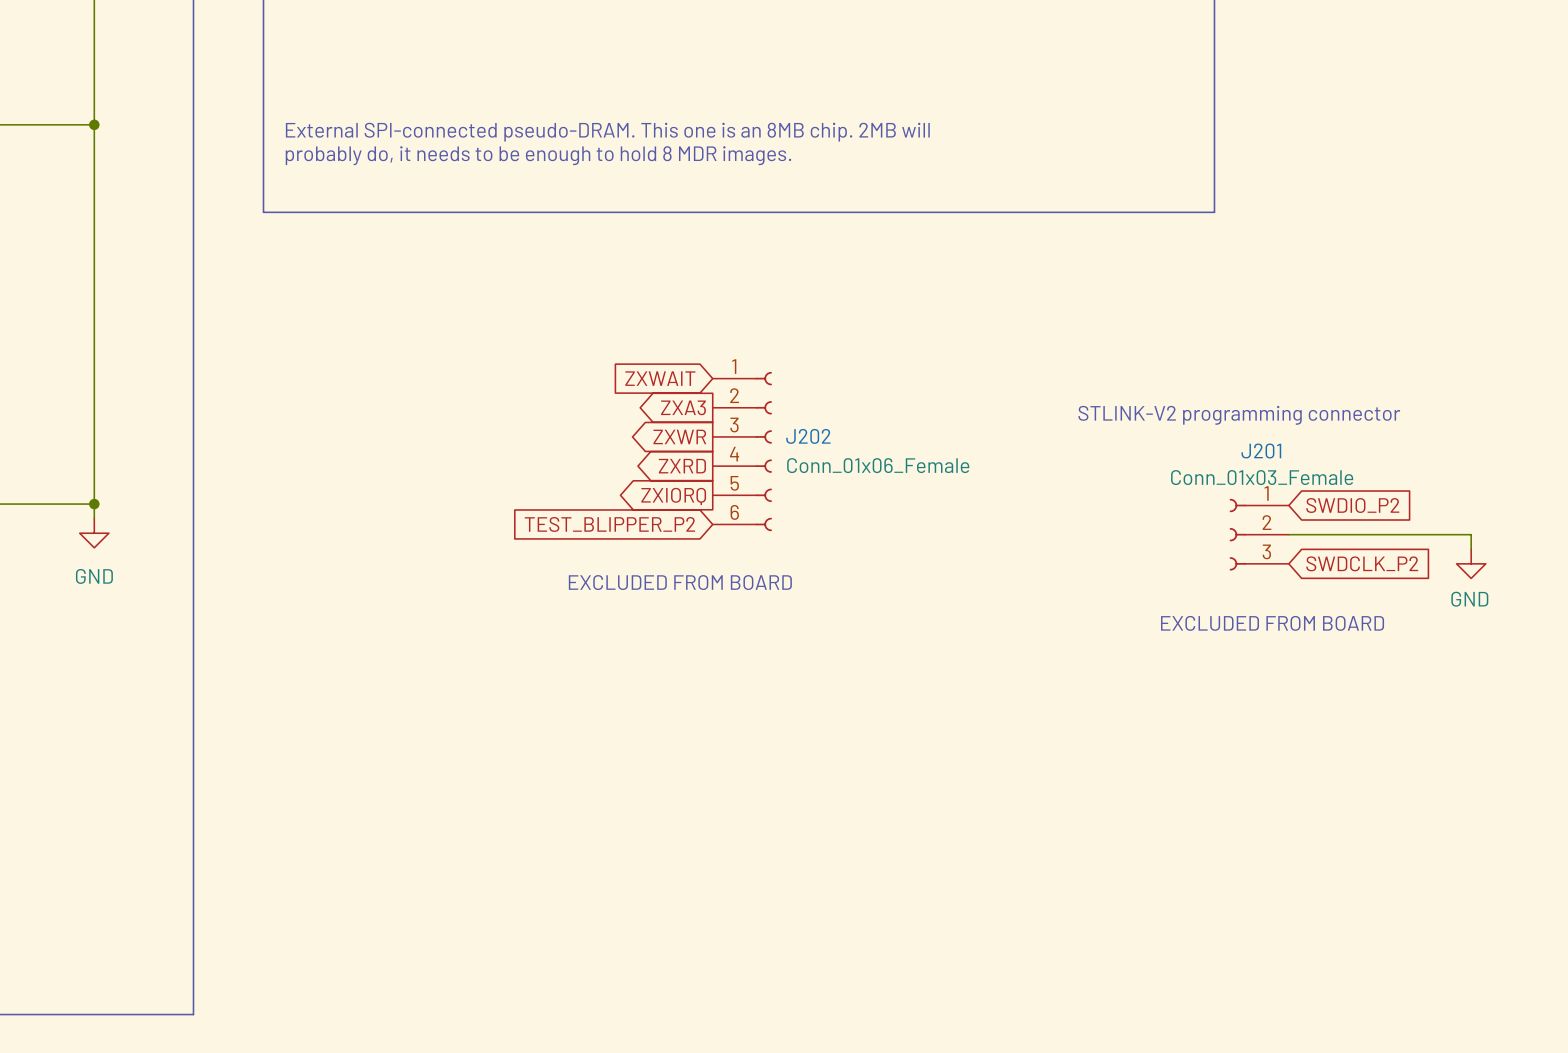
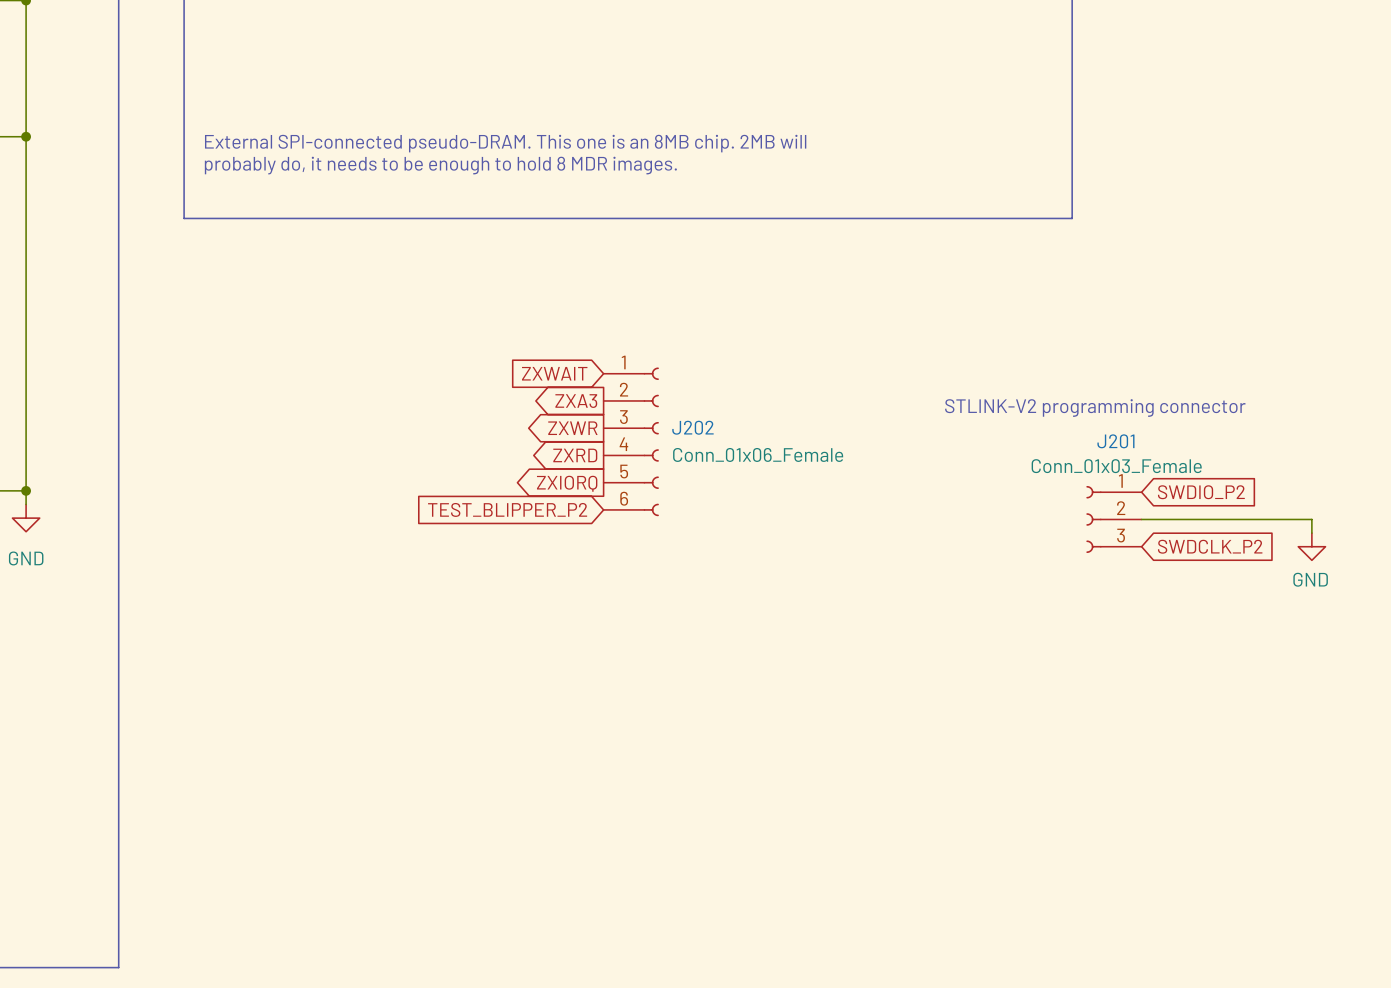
text: EXCLUDED FROM BOARD (680, 582) -> none
text: EXCLUDED FROM BOARD (1272, 623) -> none

